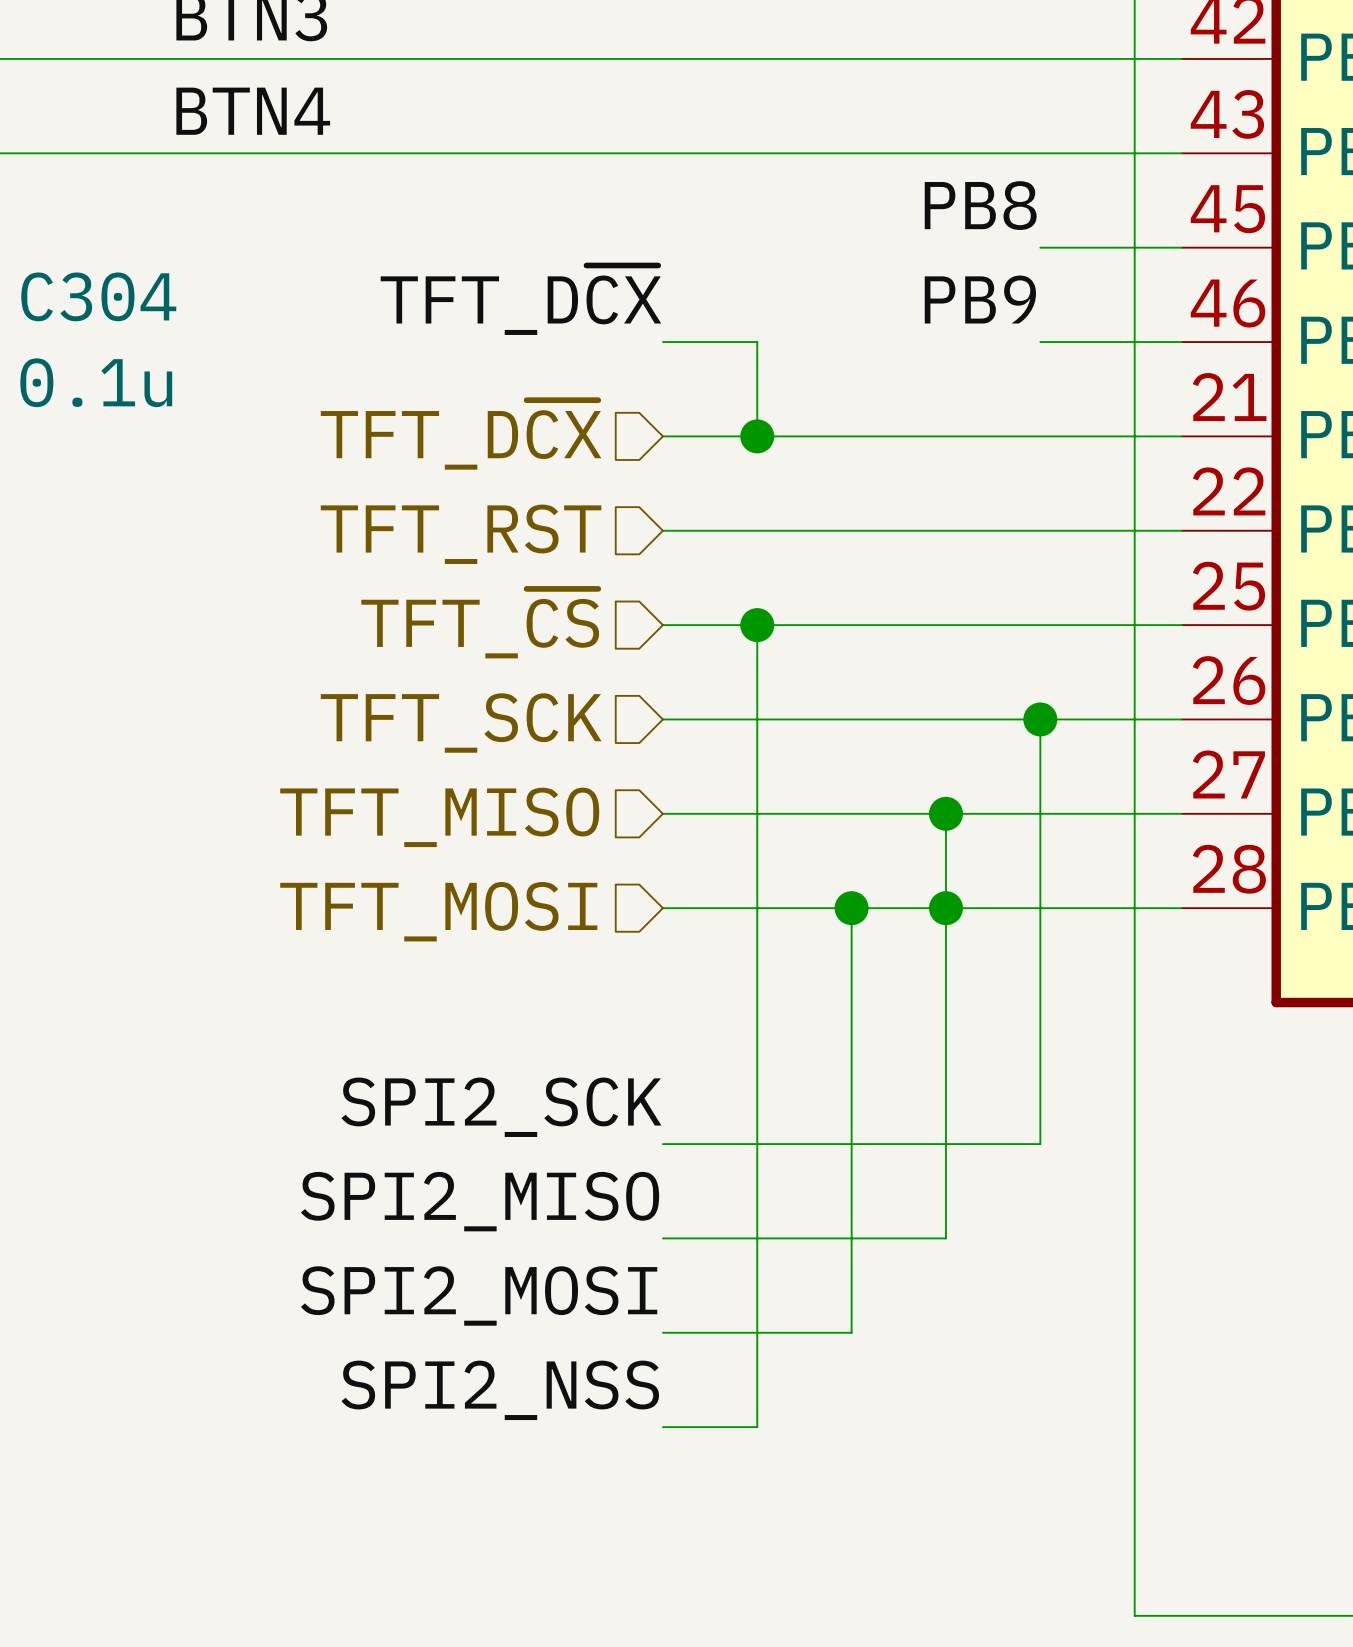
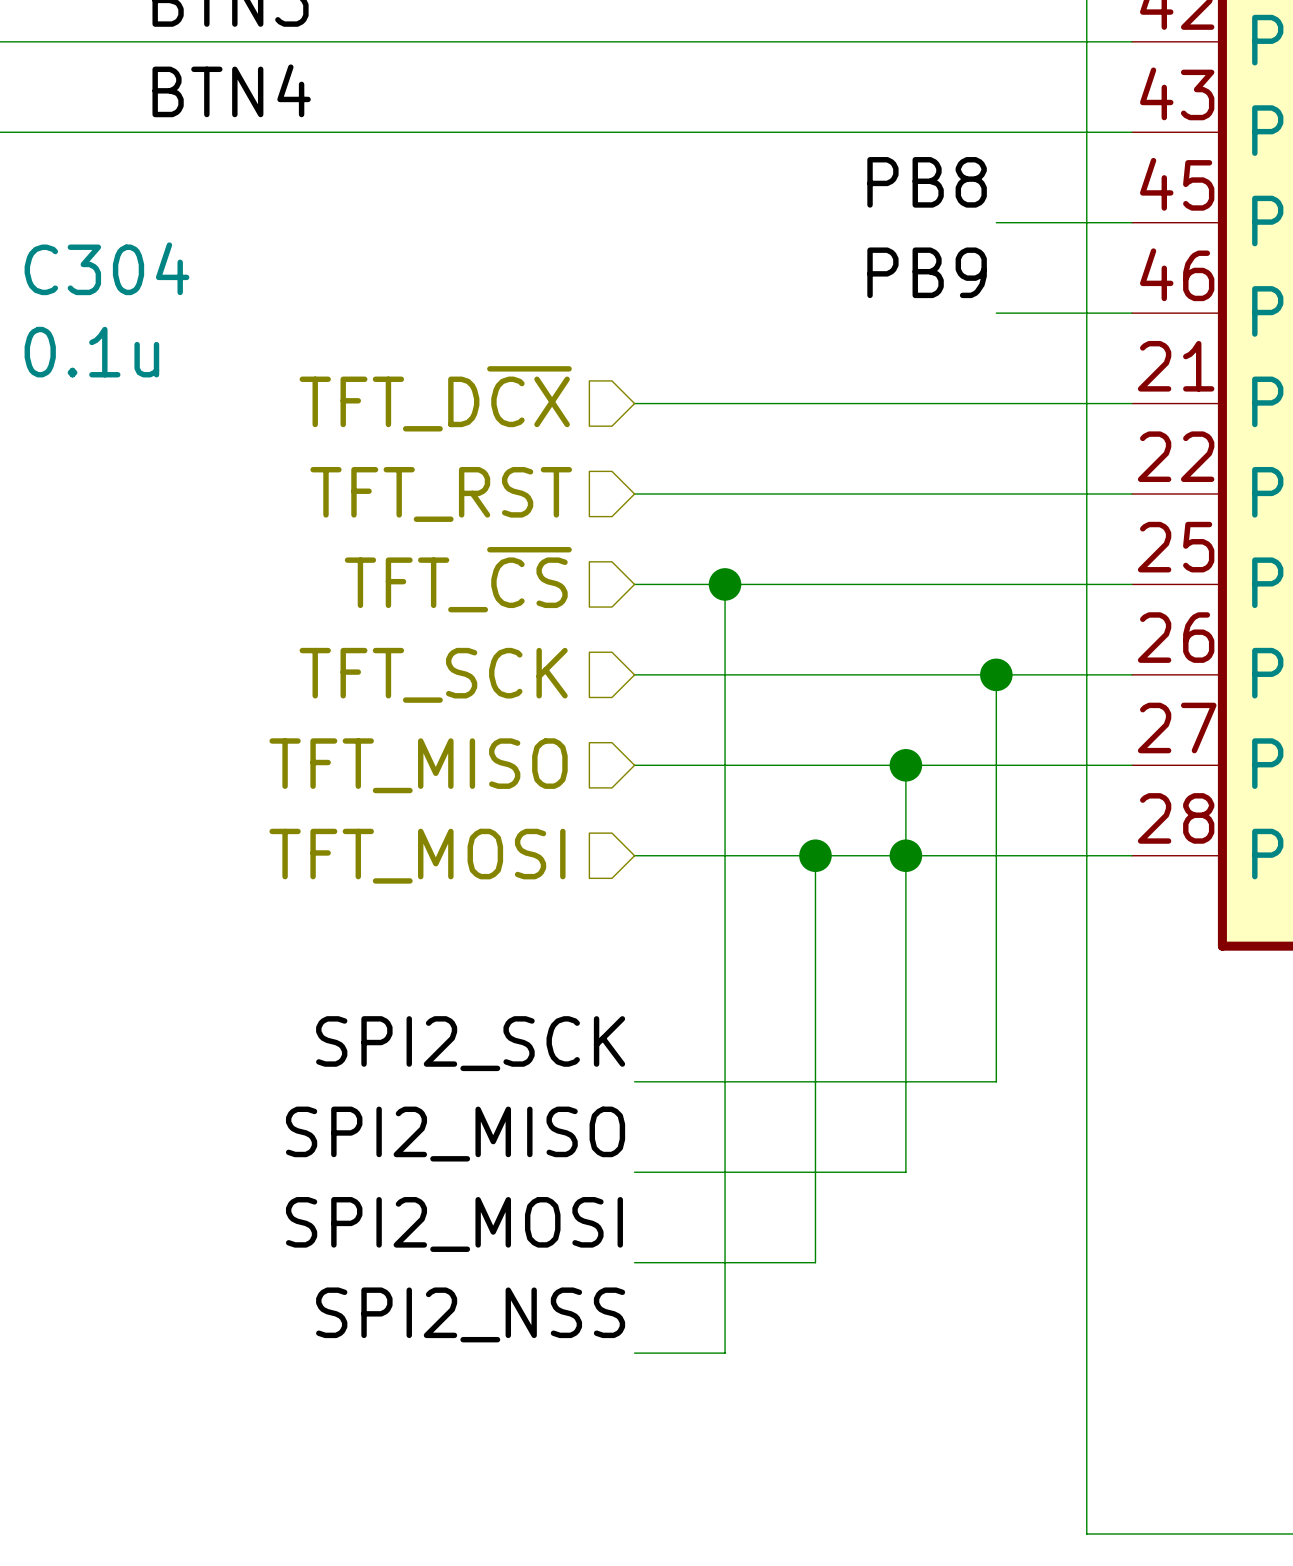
label: TFT_D~{CX} (520, 300) -> none
wire: (662, 342) (757, 342) (757, 436) -> none
junction: (757, 436) -> none

